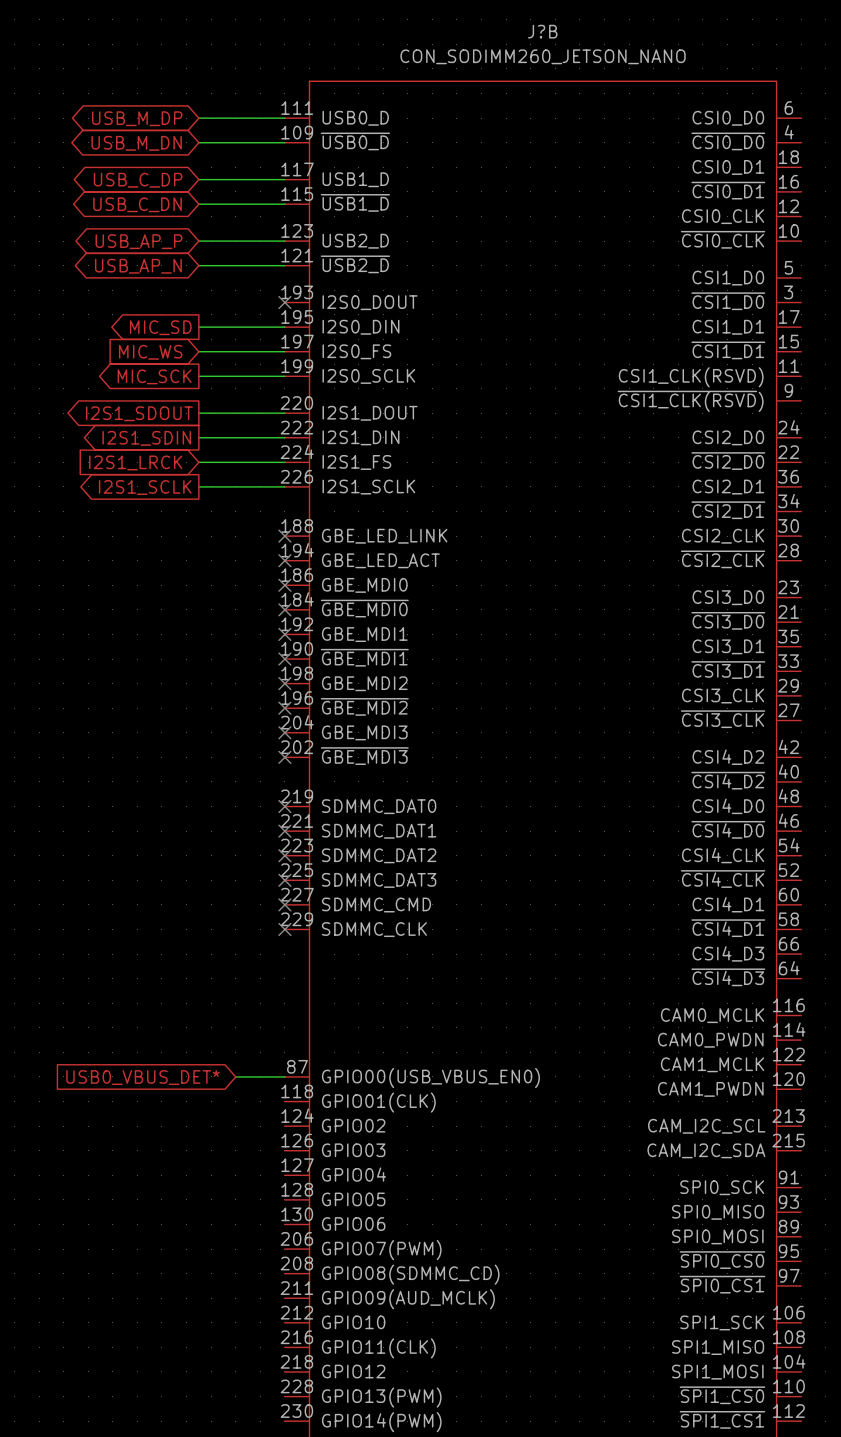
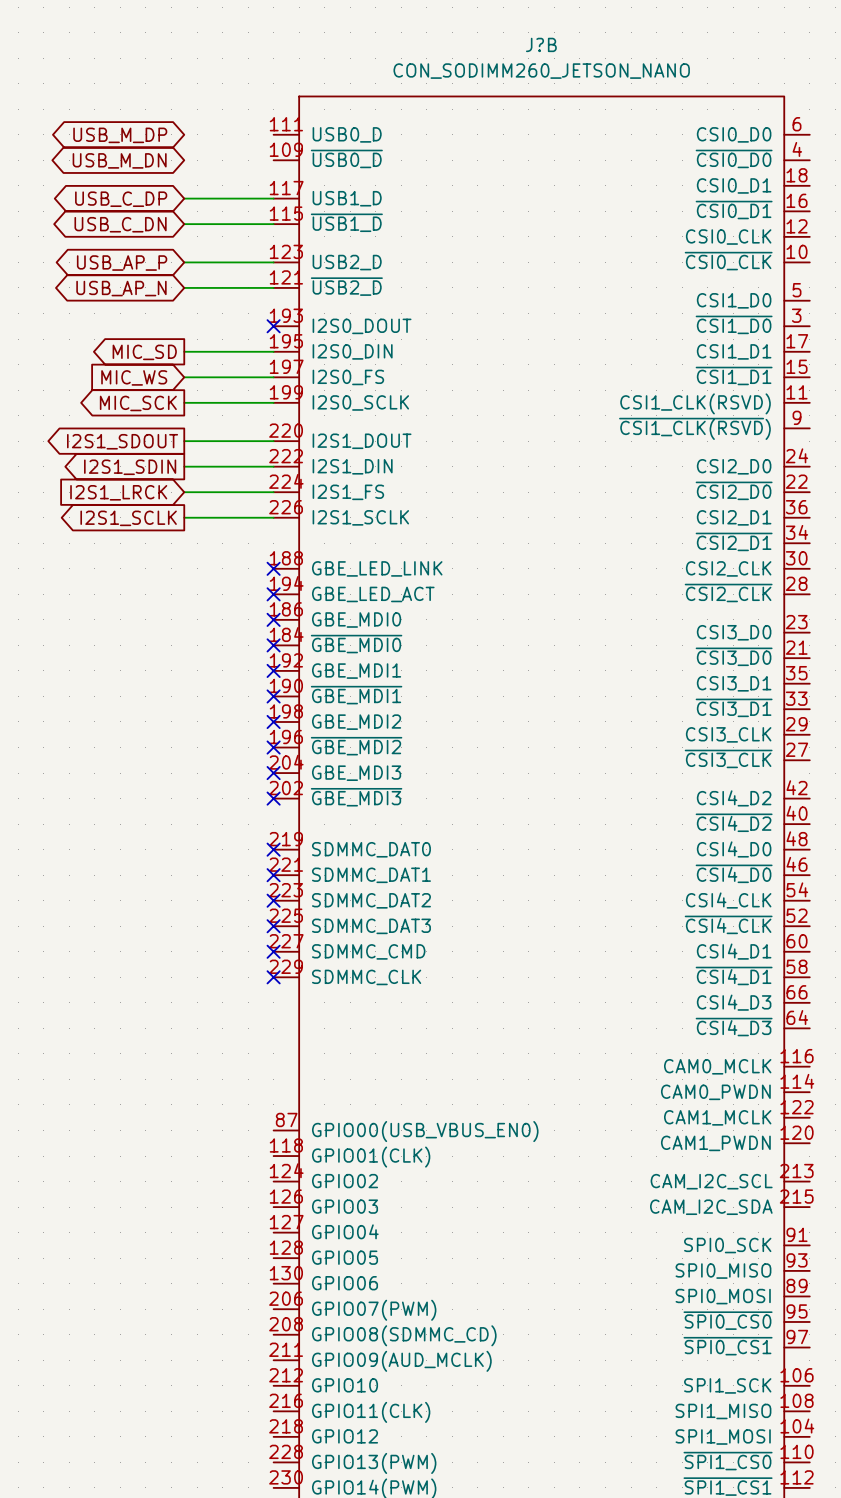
wire: (198, 118) (284, 118) -> none
wire: (198, 142) (284, 142) -> none
wire: (235, 1076) (284, 1076) -> none
global label: USB0_VBUS_DET* (143, 1077) -> none

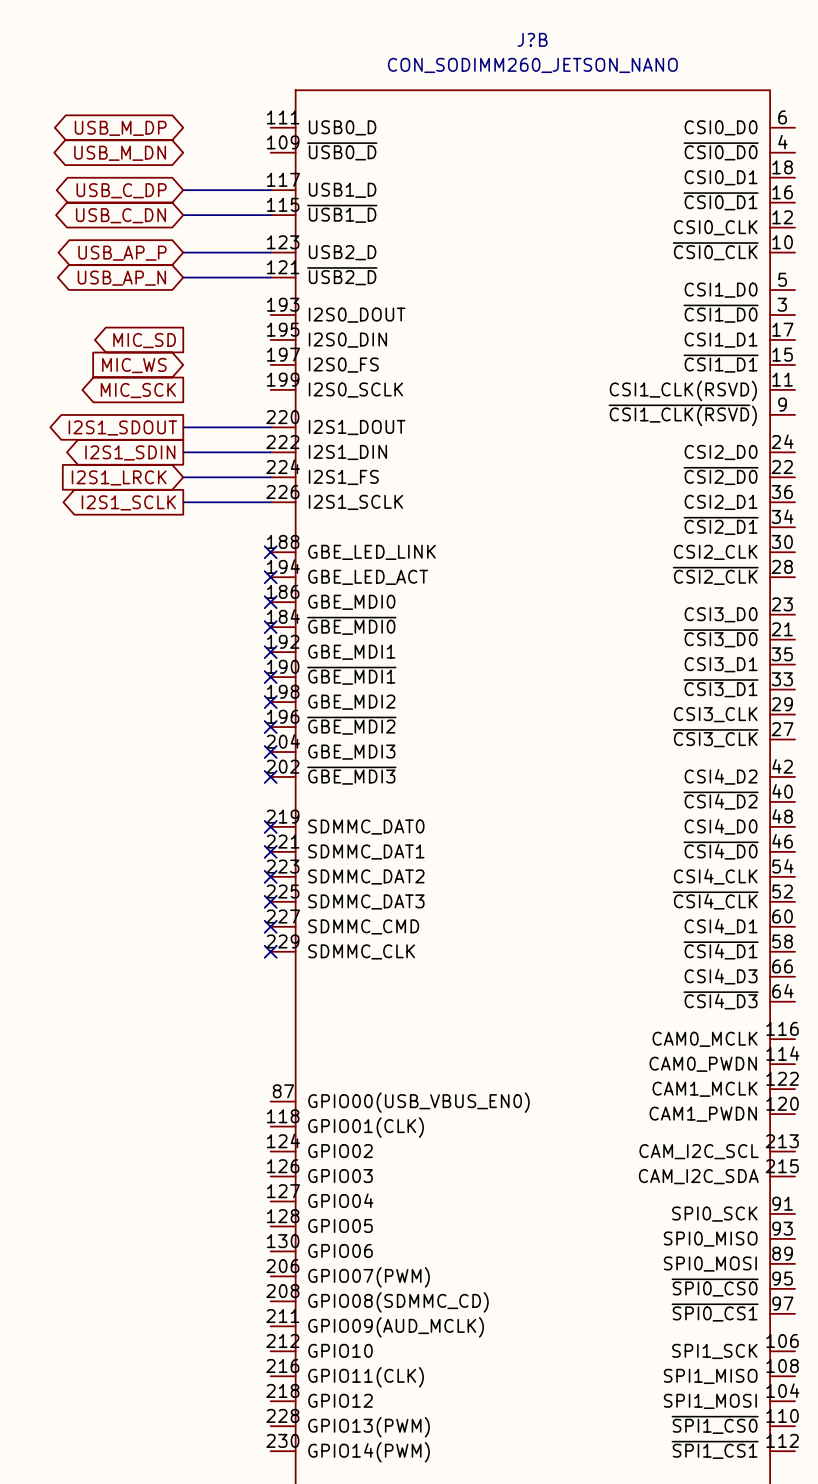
no-connect mark: (273, 326) -> none
wire: (184, 351) (273, 351) -> none
wire: (184, 377) (273, 377) -> none
wire: (184, 402) (273, 402) -> none

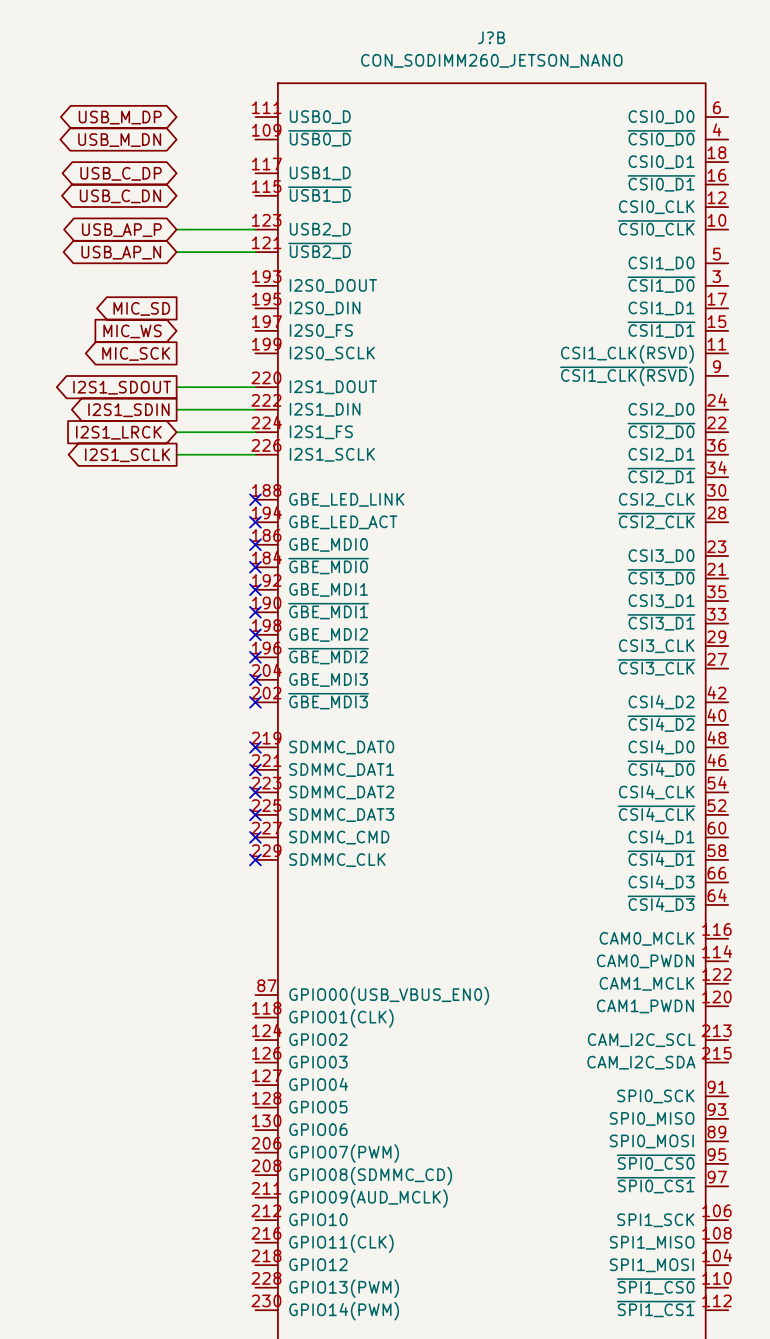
wire: (183, 190) (270, 190) -> none
wire: (183, 215) (270, 215) -> none

